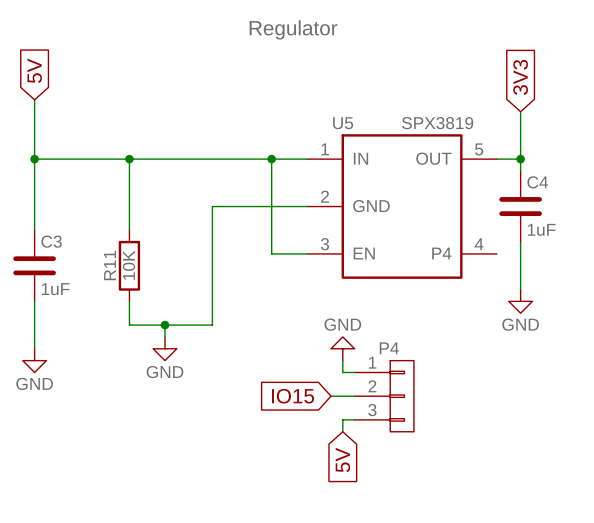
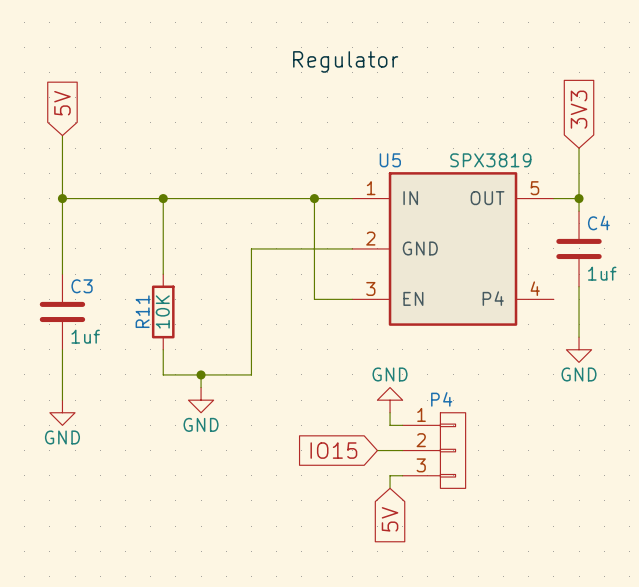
C4 value: 1uF (541, 229) -> 1uf (602, 273)
C3 value: 1uF (55, 289) -> 1uf (85, 336)

